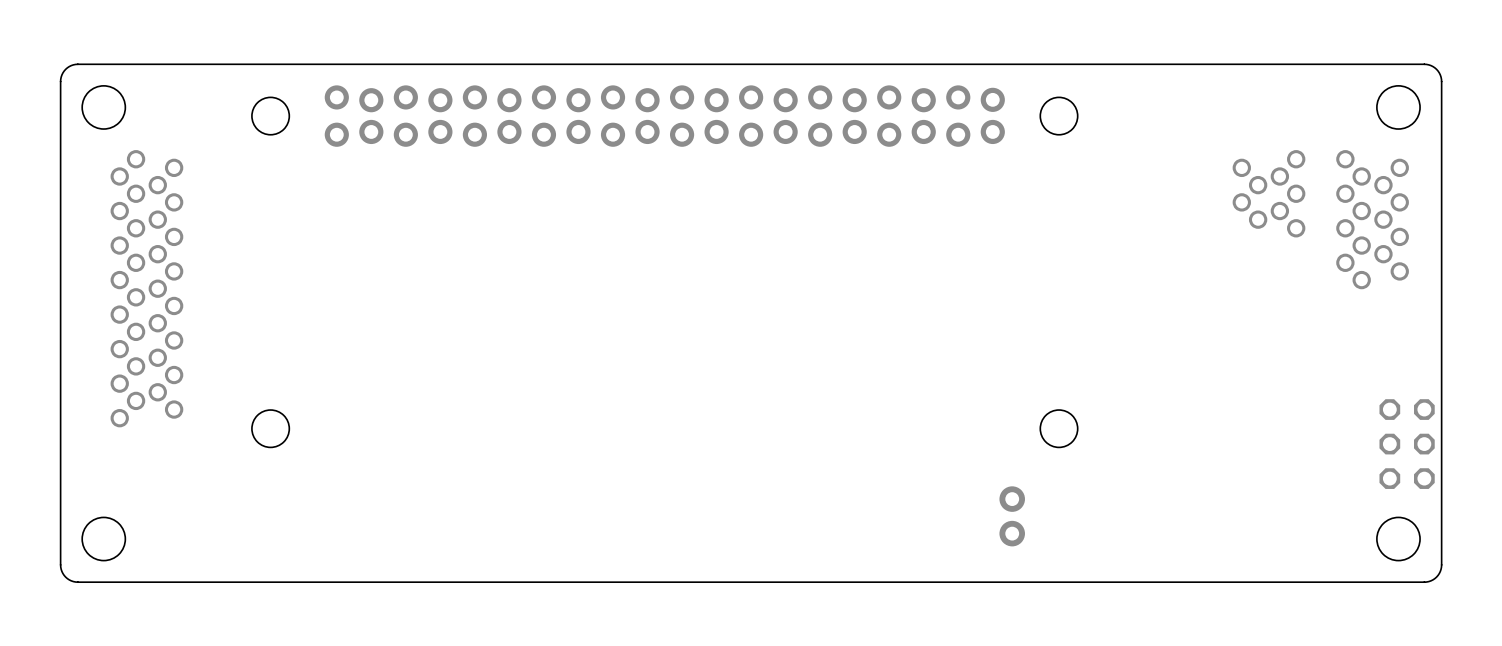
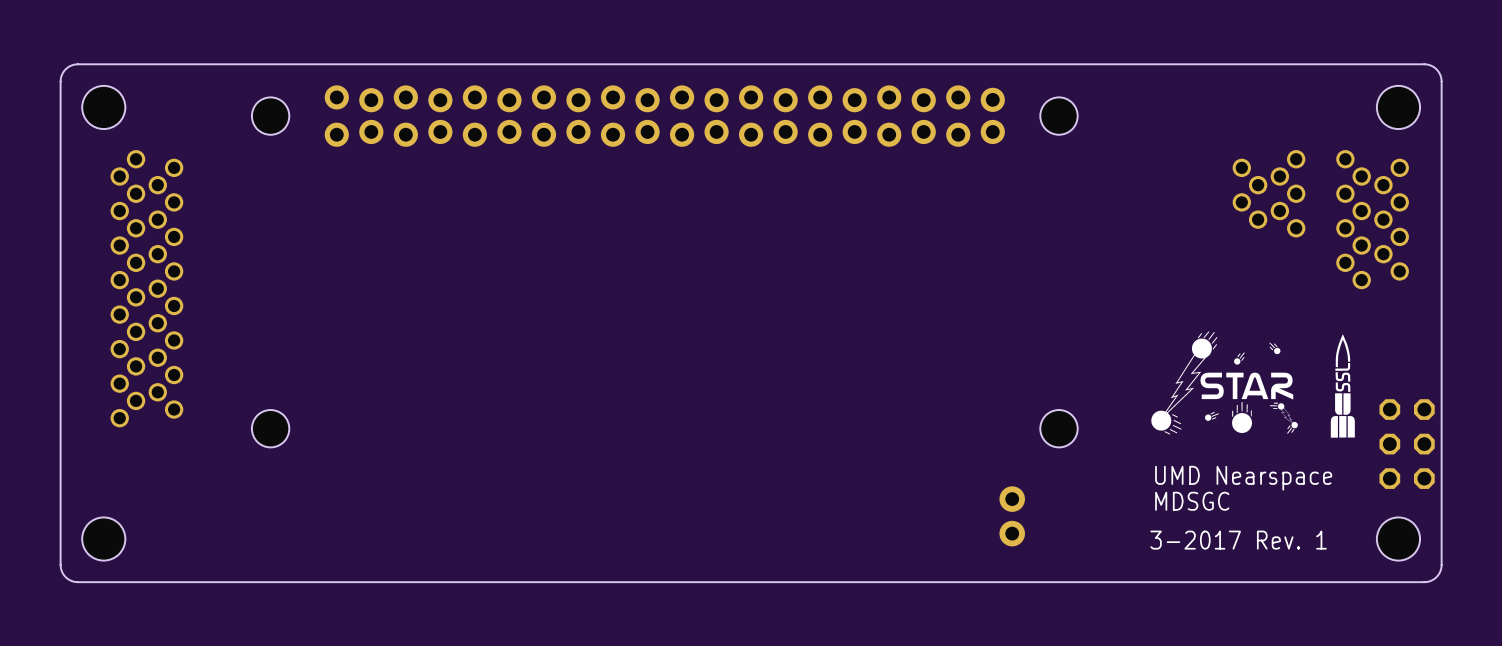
drawing: none -> [1151, 331, 1298, 435]
drawing: none -> [1330, 334, 1355, 438]
text: none -> UMD Nearspace (1243, 478)
text: none -> MDSGC (1192, 501)
text: none -> 3-2017 Rev. 1 (1238, 540)

